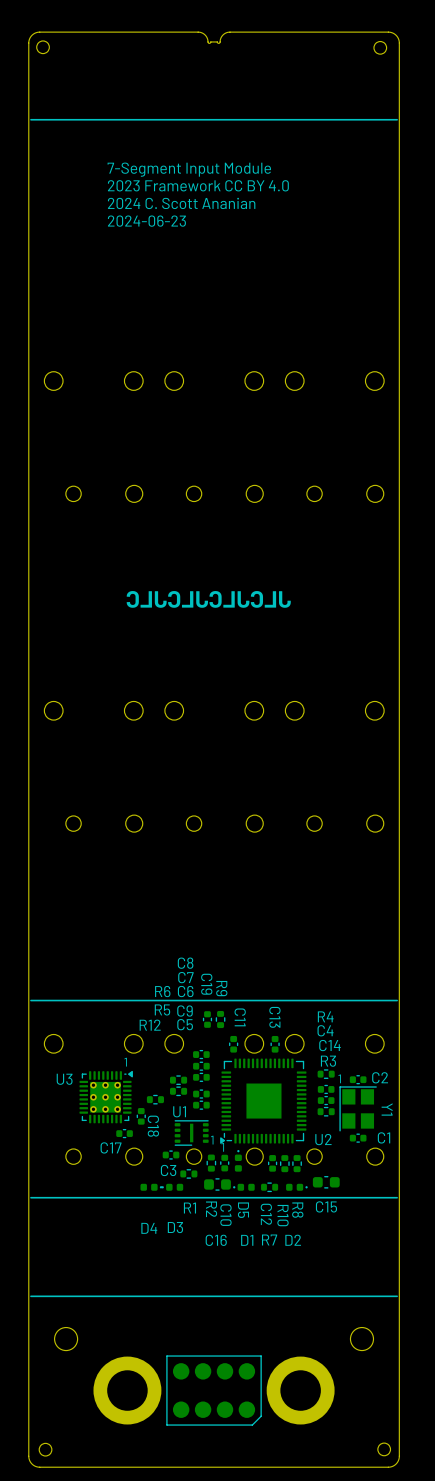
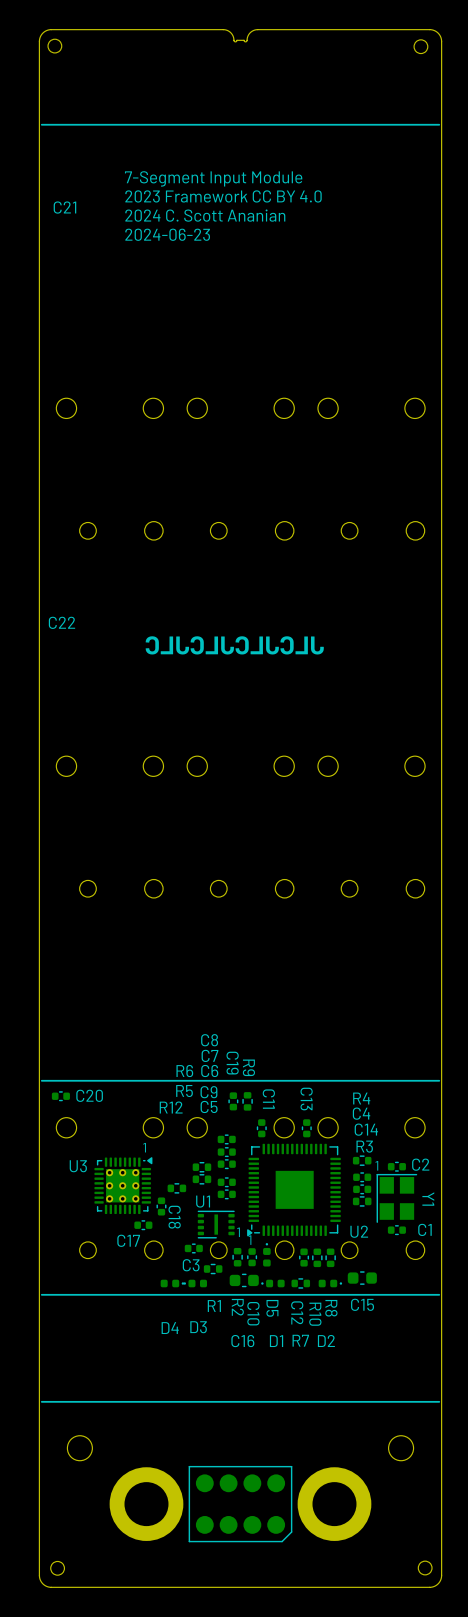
C21: none -> (64, 207)
C22: none -> (61, 622)
C20: none -> (60, 1096)

